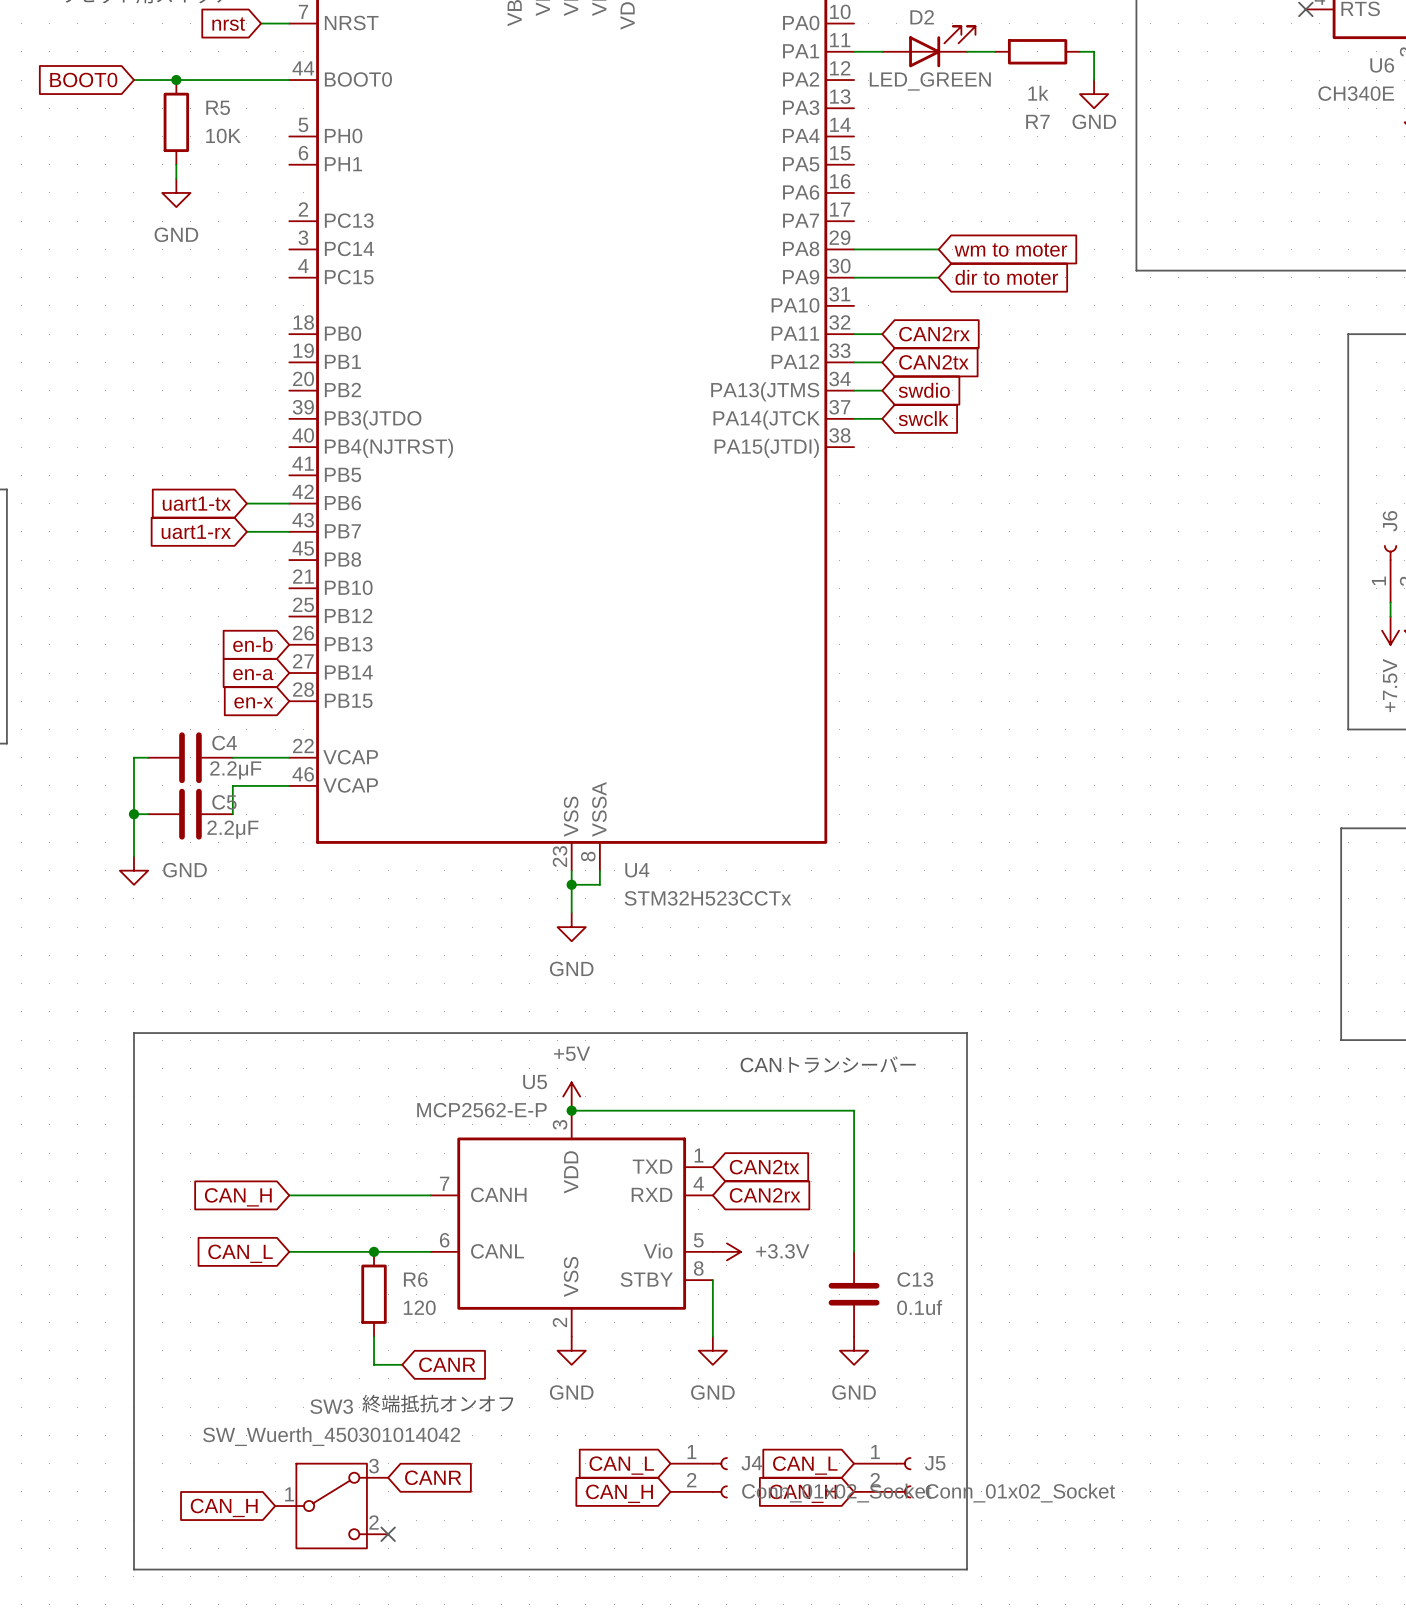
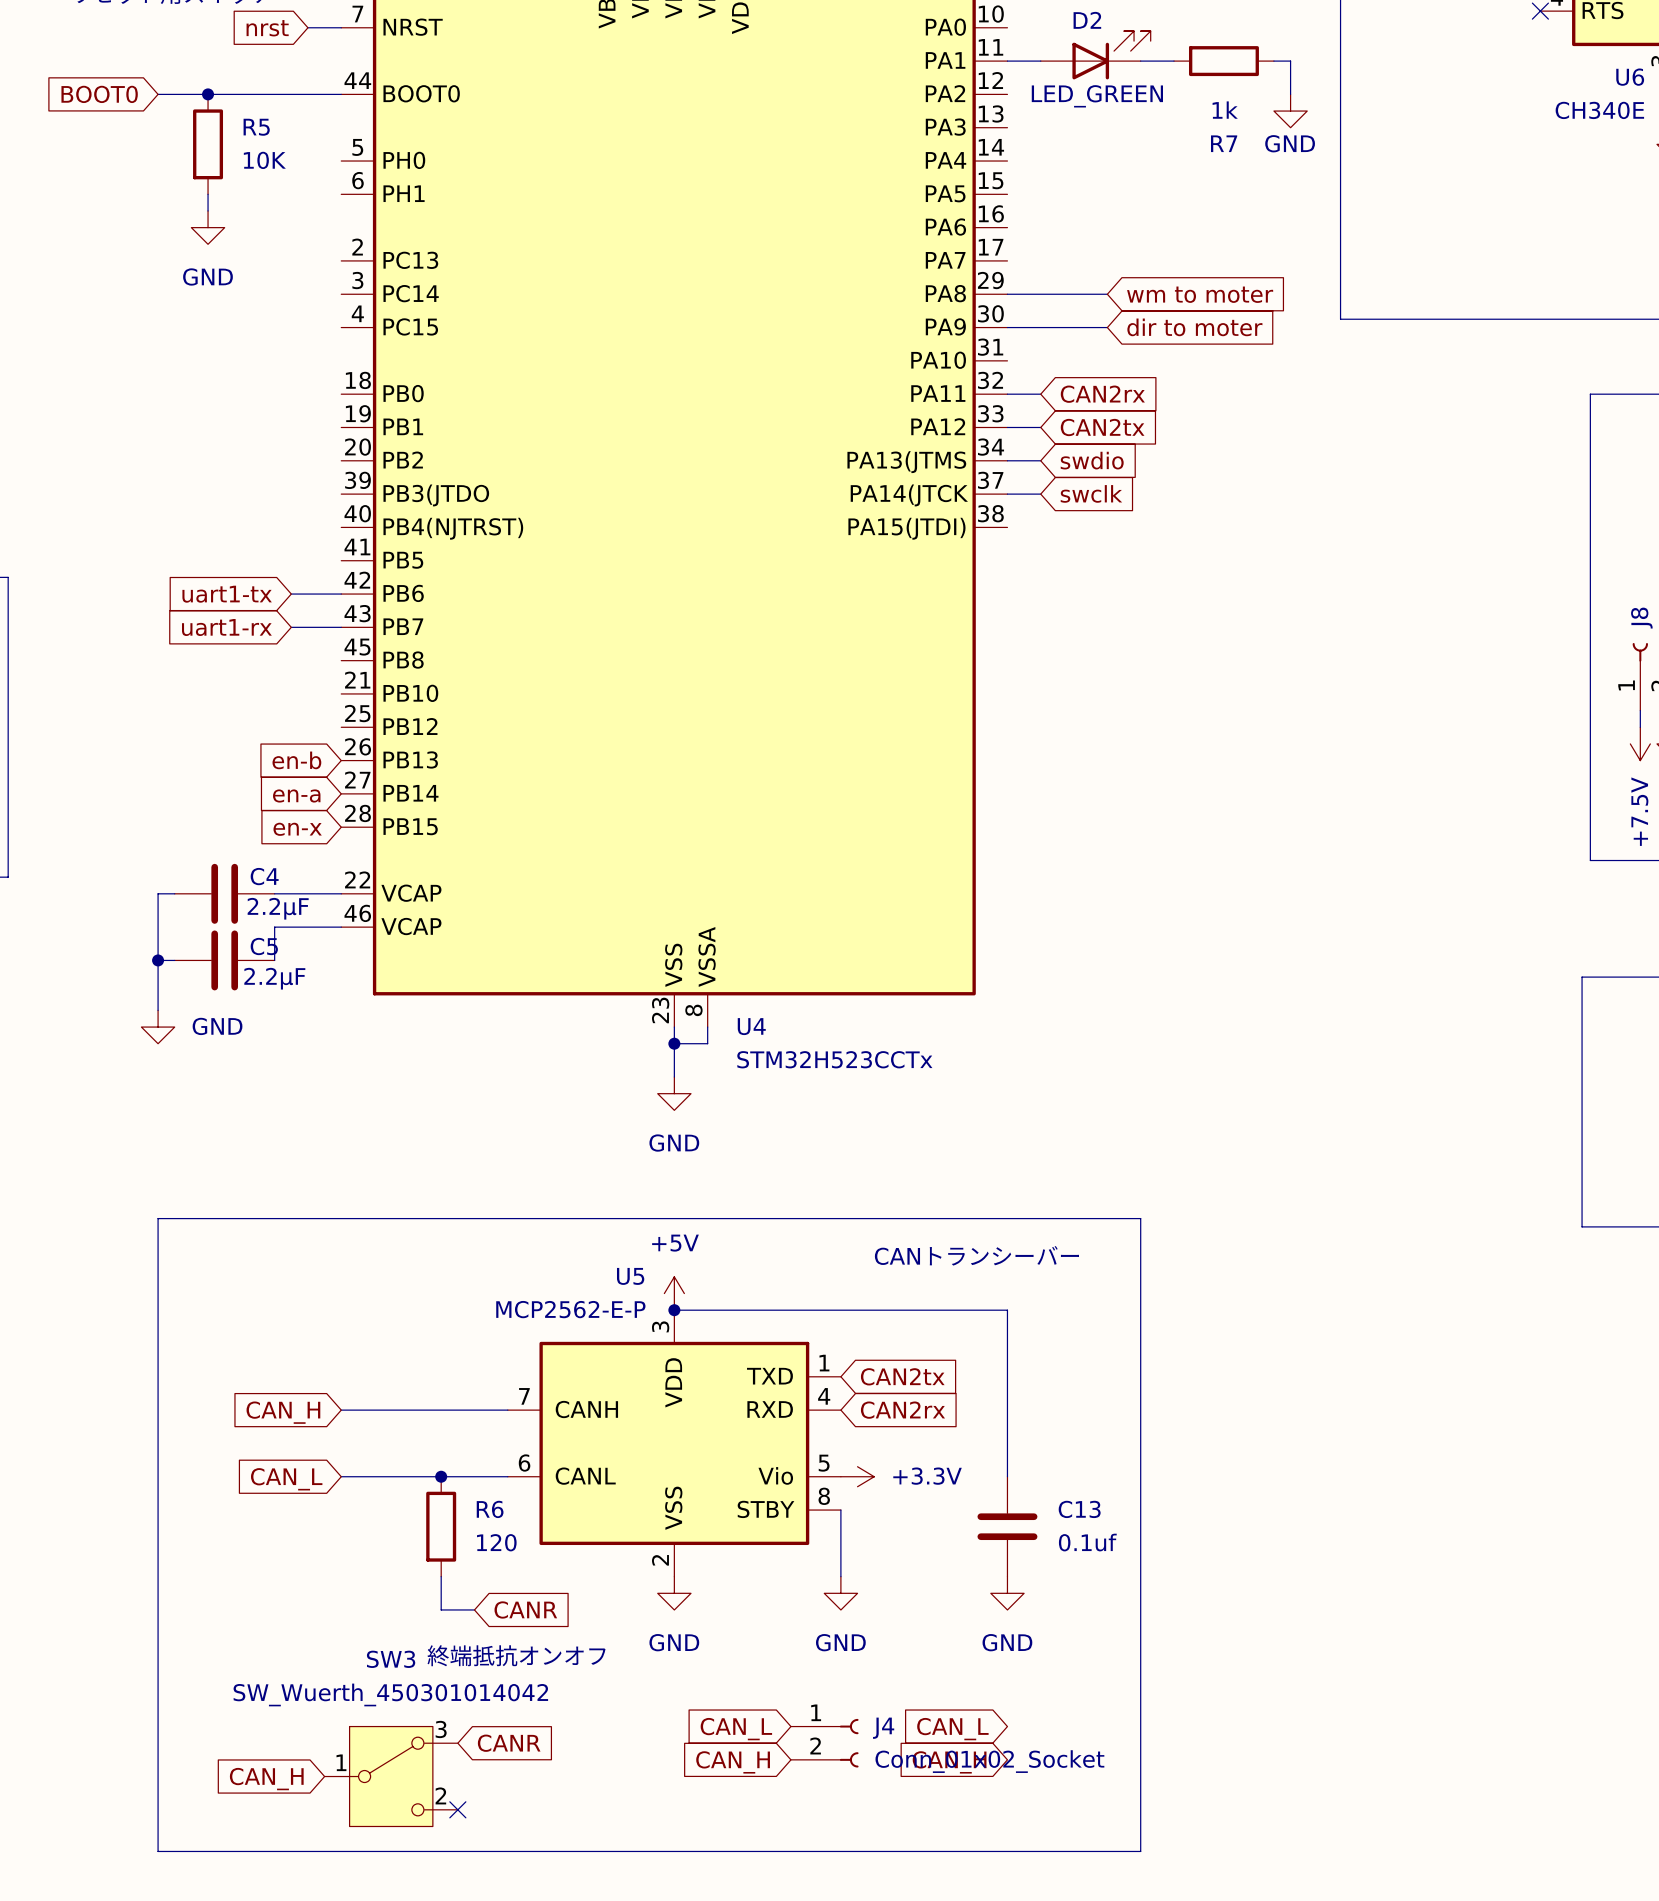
J6 name: J6 (1390, 521) -> J8 (1641, 618)
J5: Conn_01x02_Socket (882, 1477) -> none

